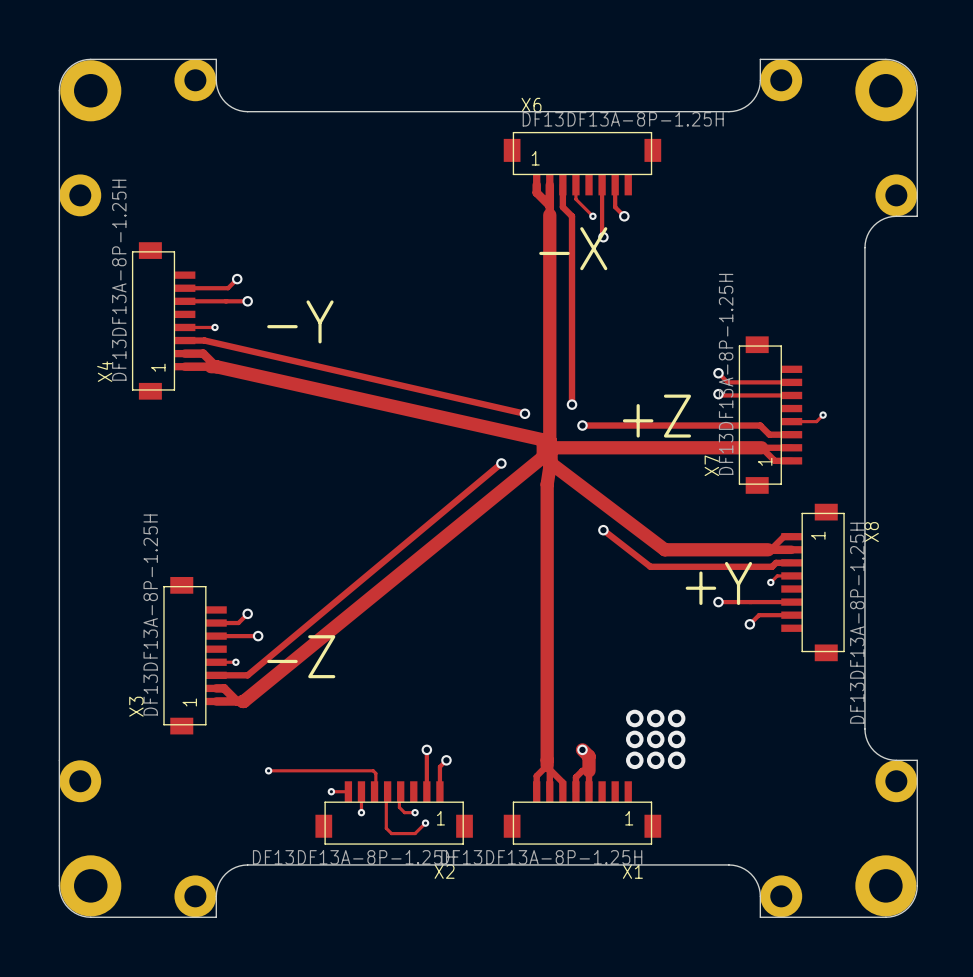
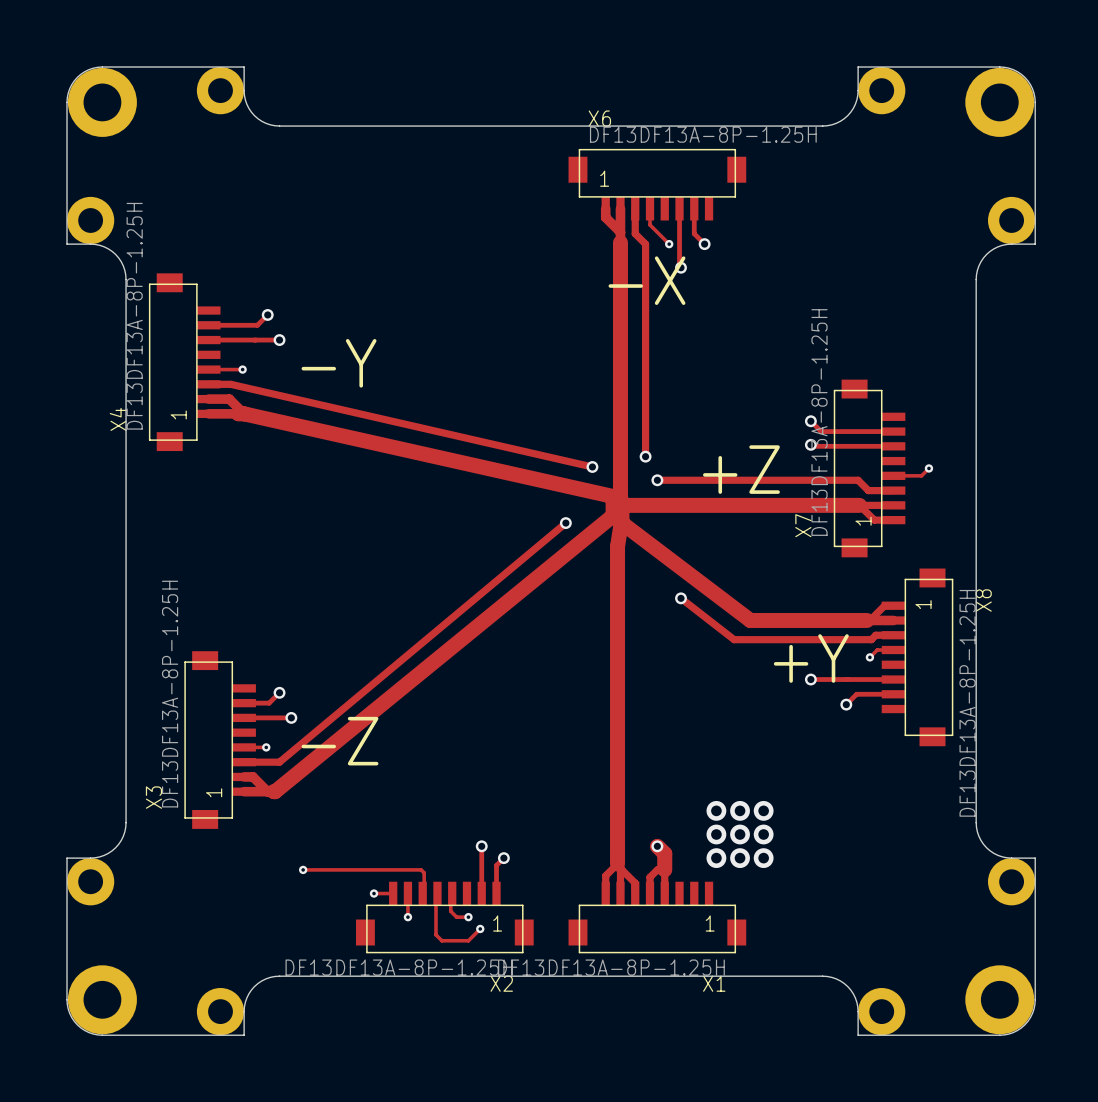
board edge: (59, 216) (59, 760) -> (67, 244) (95, 244) (108, 248) (121, 261) (126, 279) (125, 827) (118, 844) (108, 853) (95, 857) (67, 858)

